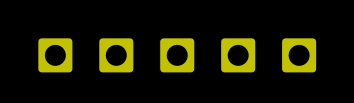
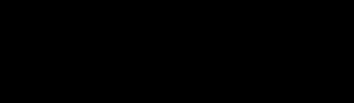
part: (55, 55) -> none
part: (116, 55) -> none
part: (177, 55) -> none
part: (238, 55) -> none
part: (299, 55) -> none

